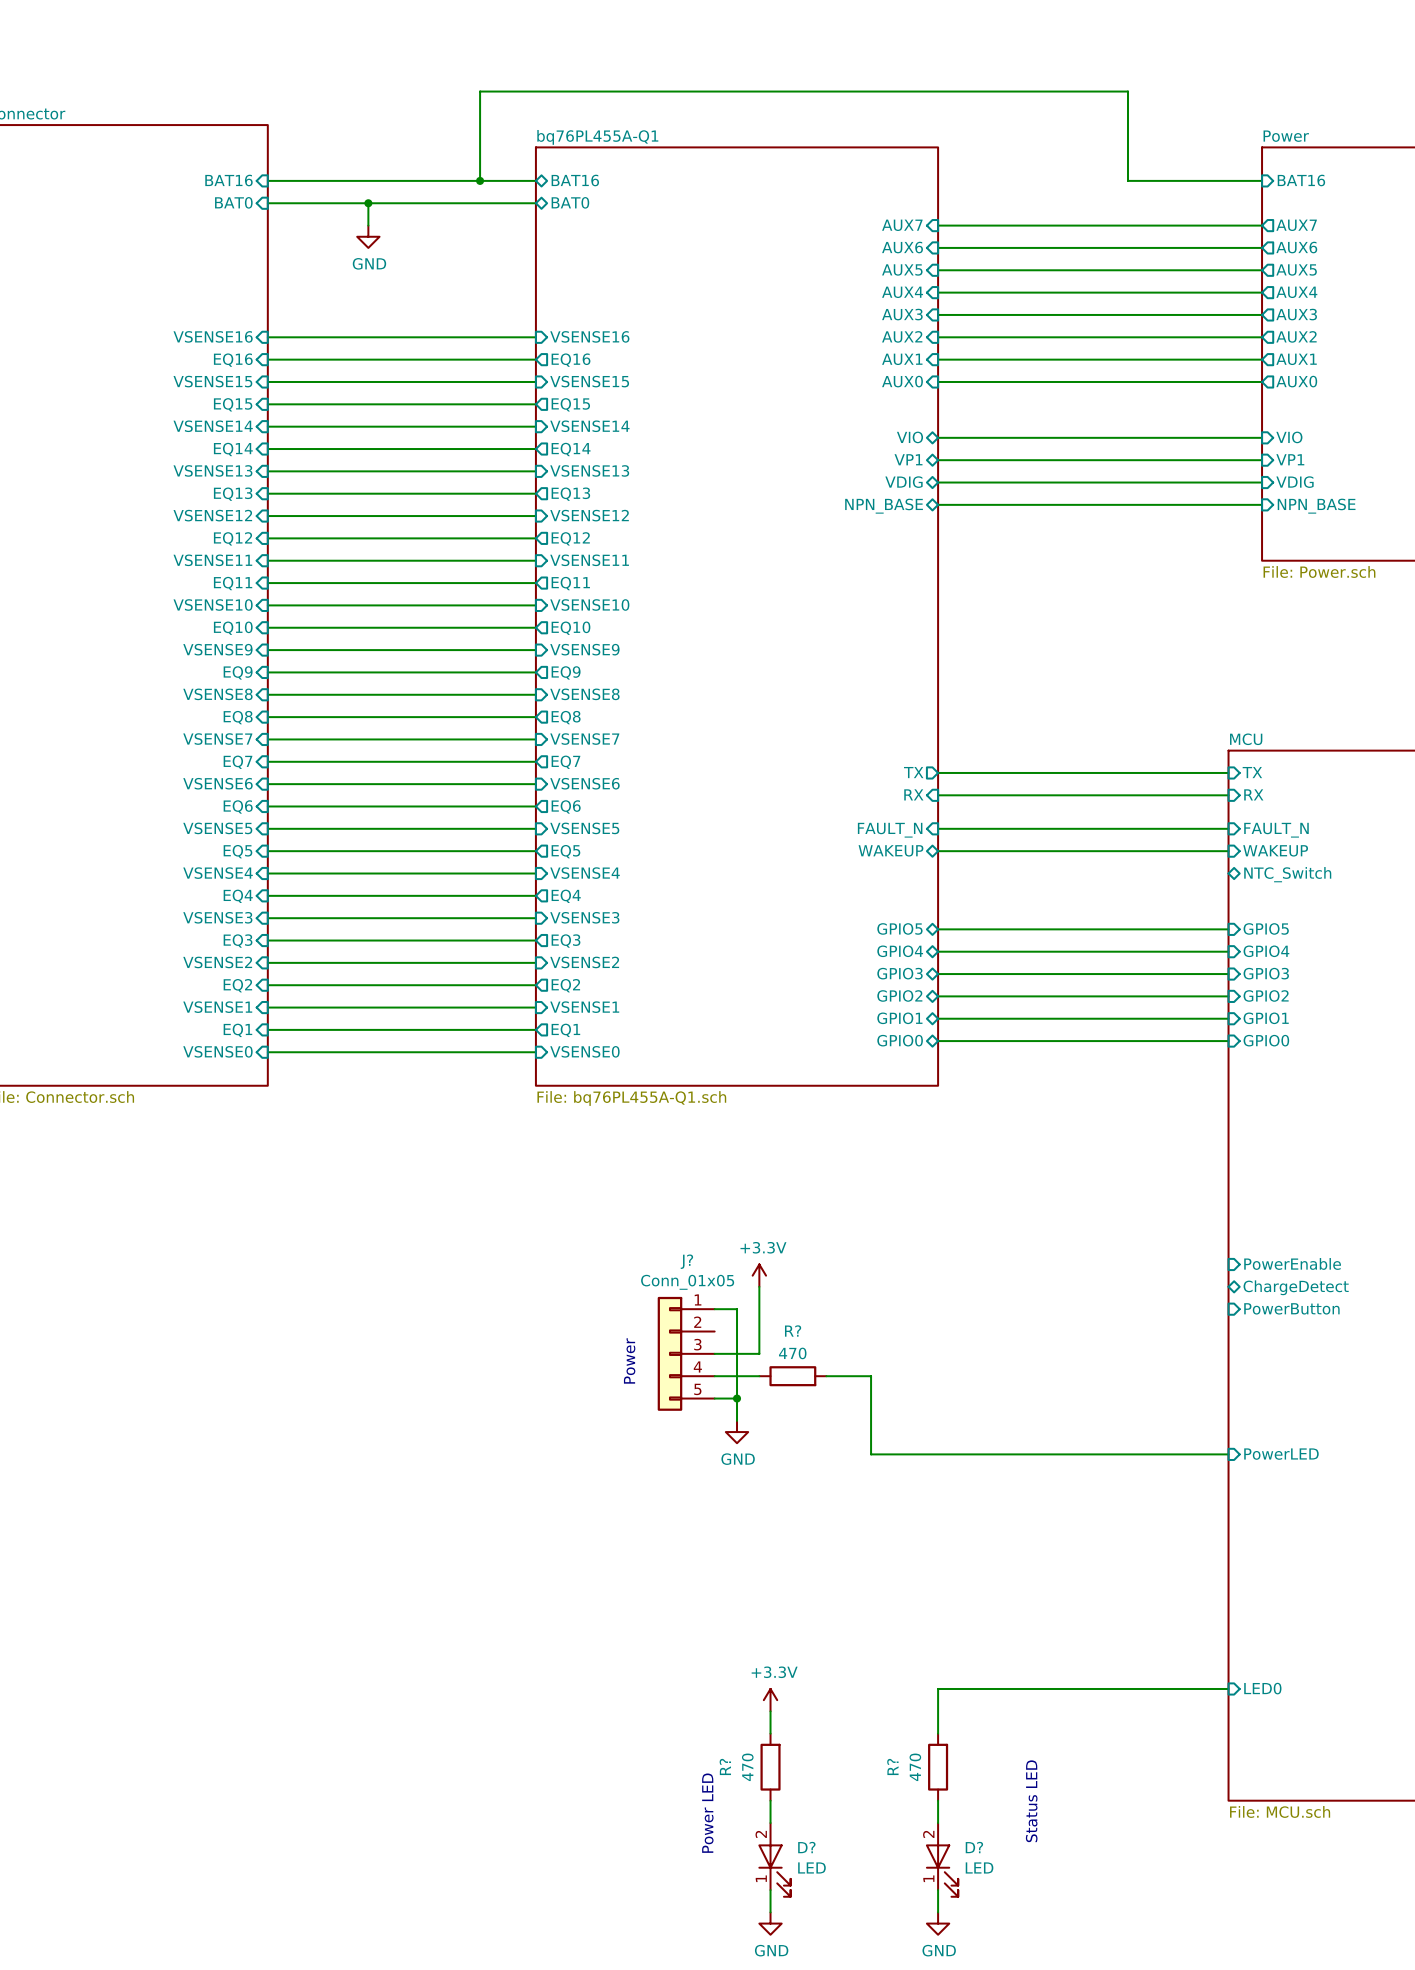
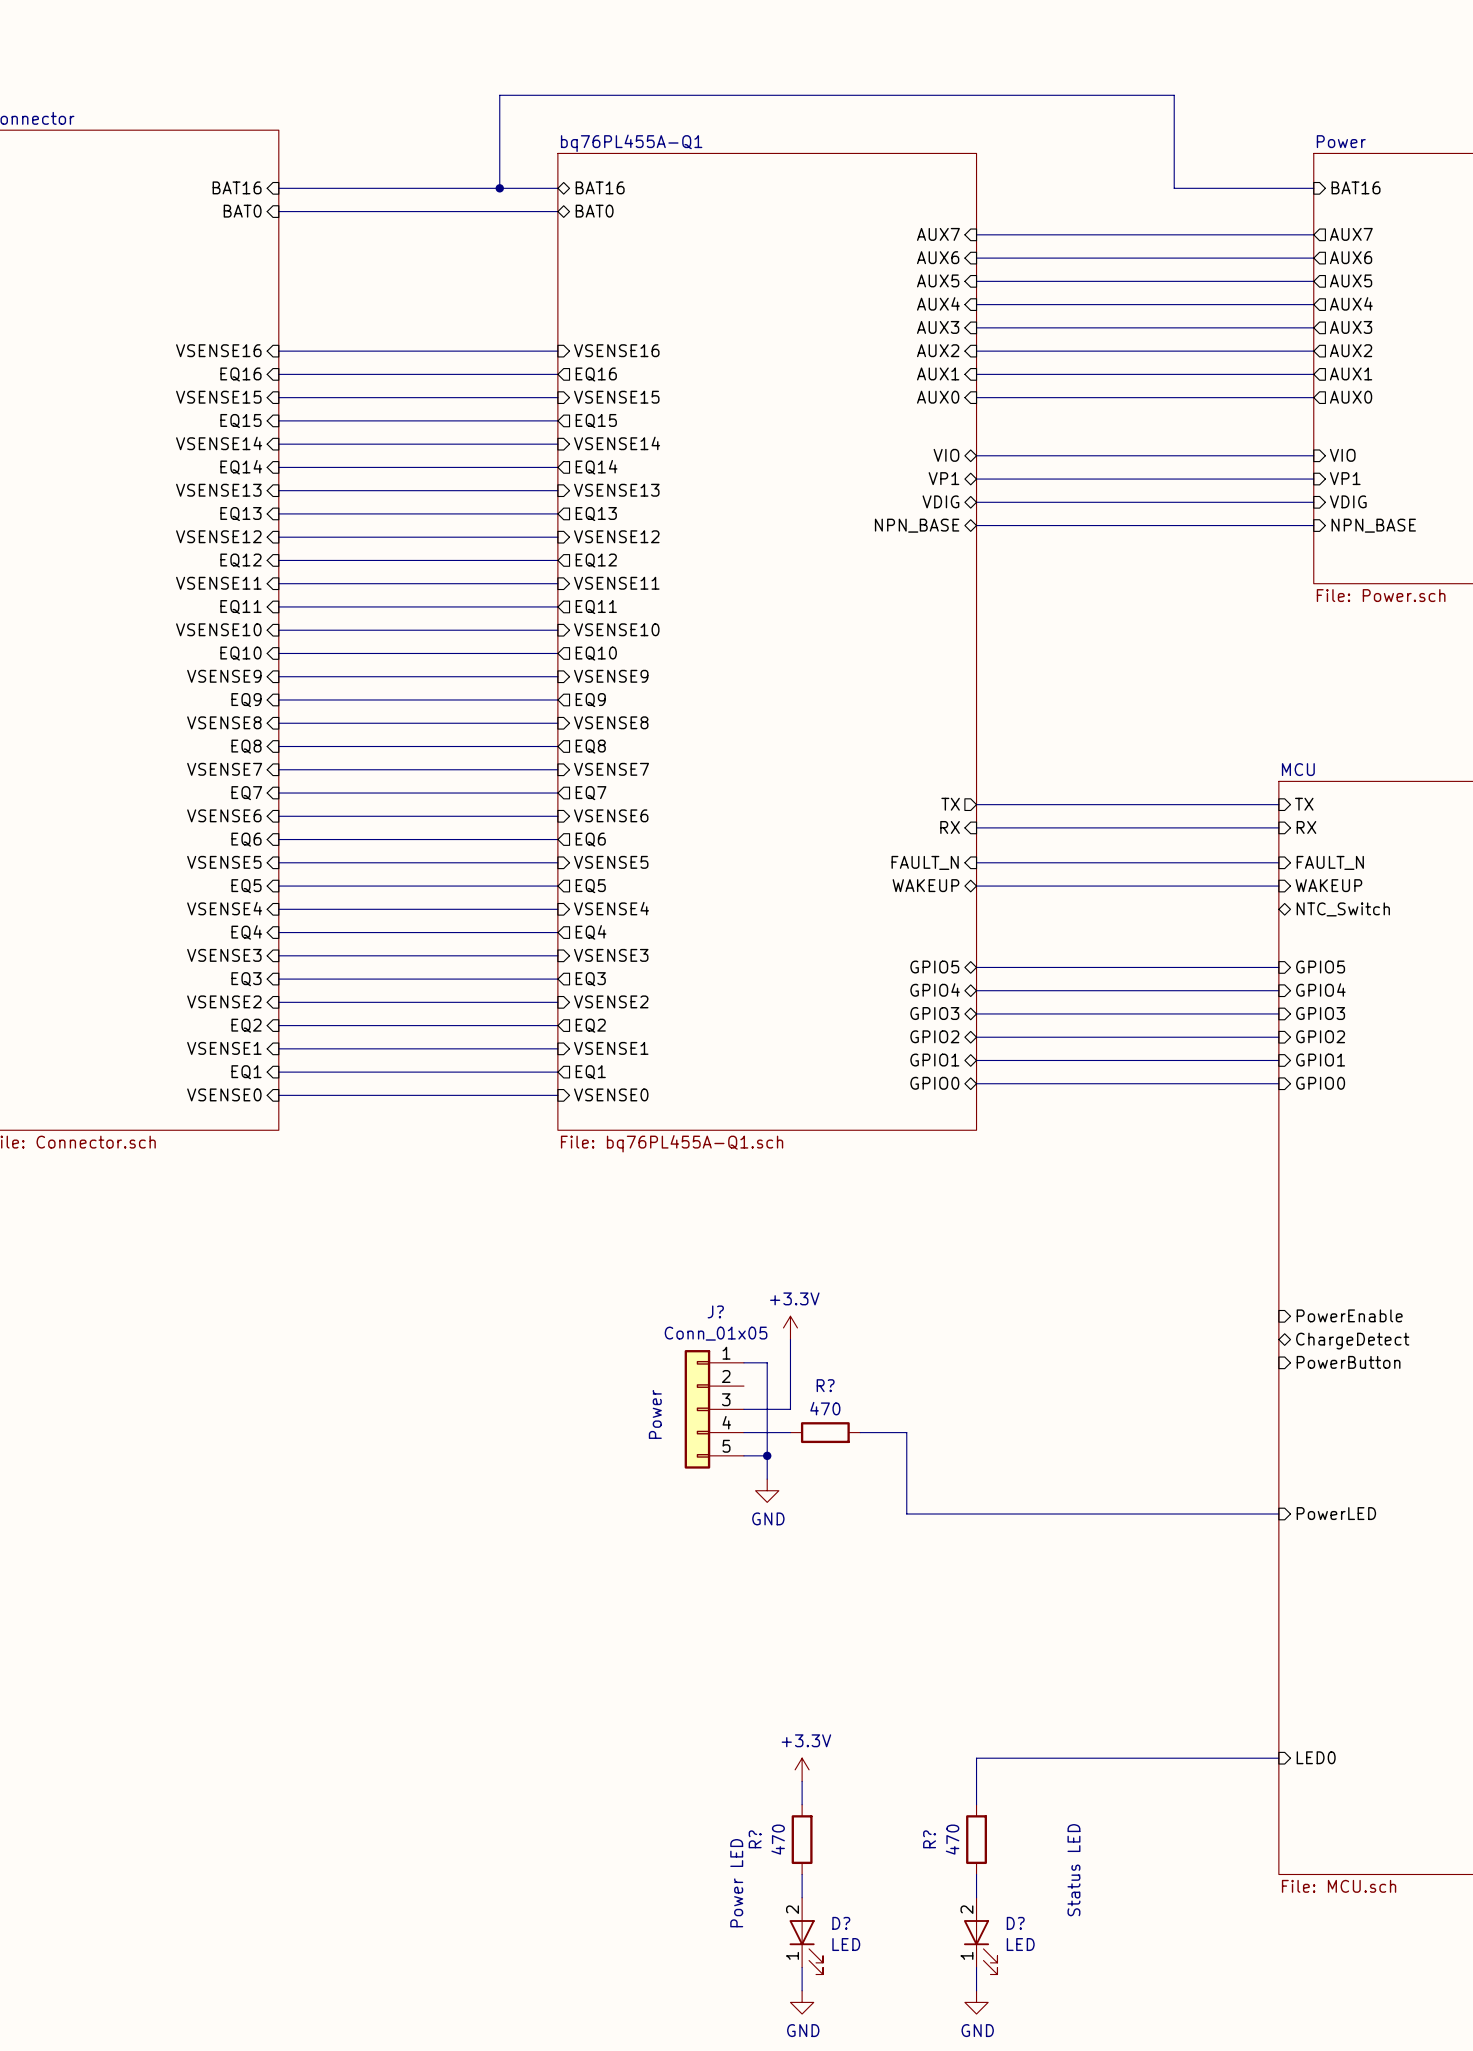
wire: (368, 203) (368, 225) -> none
junction: (368, 203) -> none
power symbol: GND (368, 236) -> none

